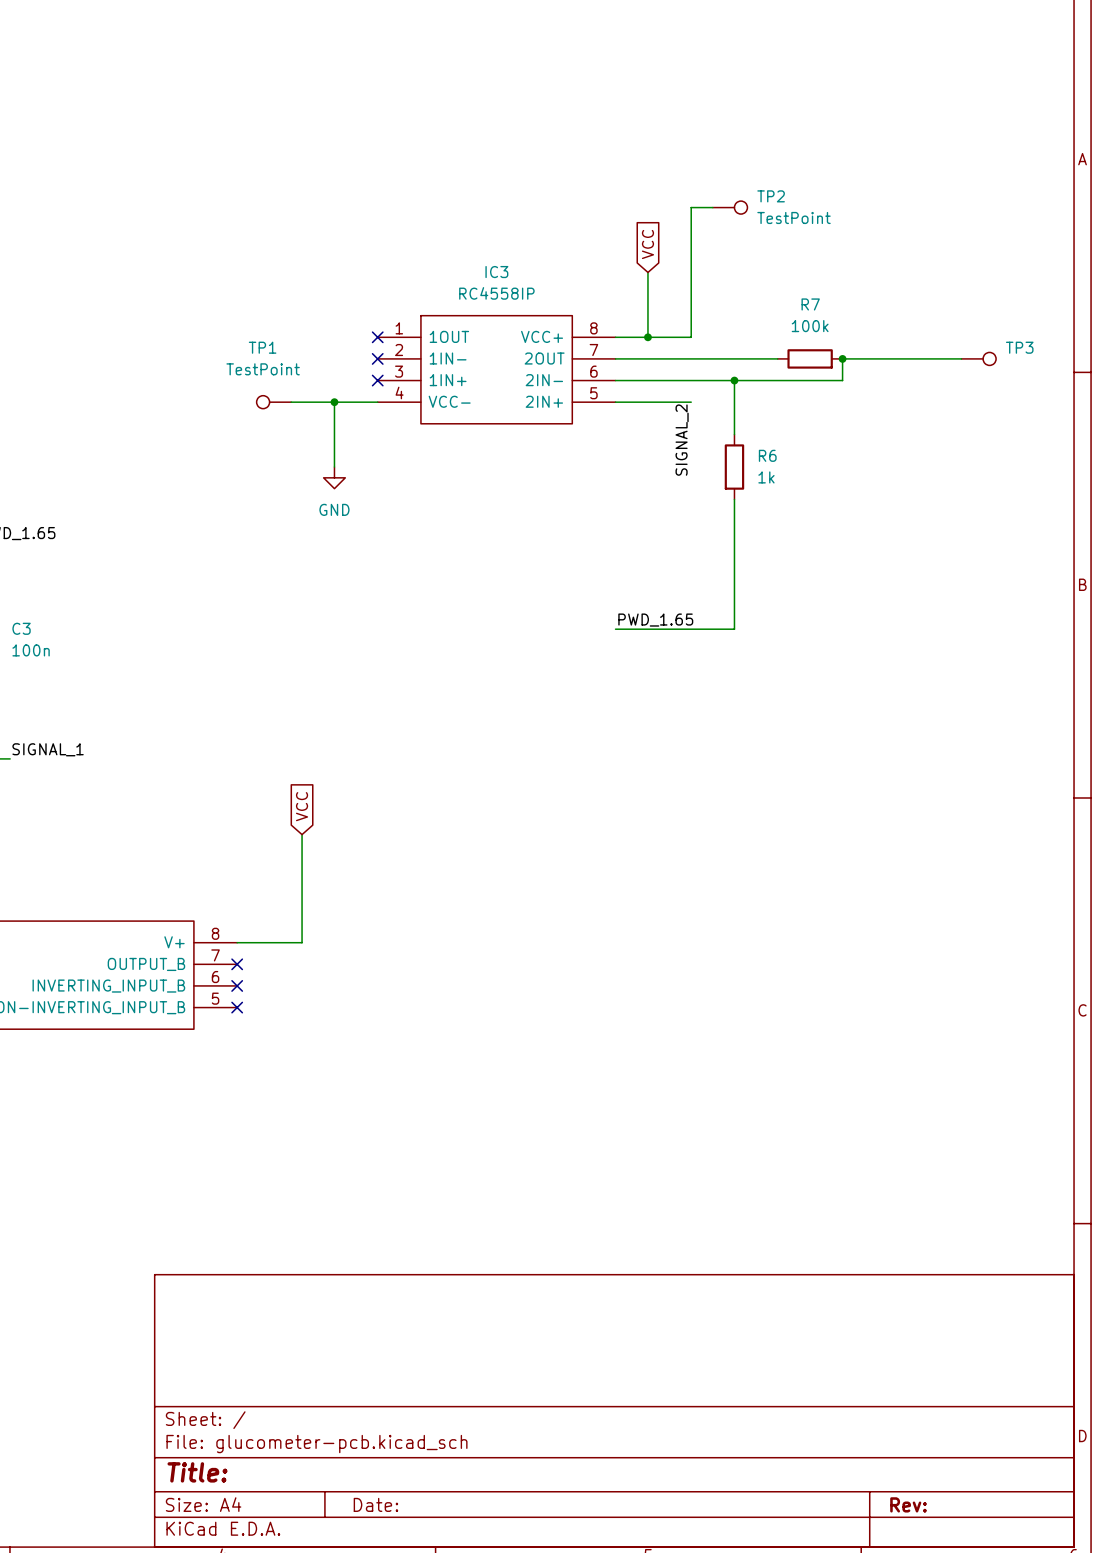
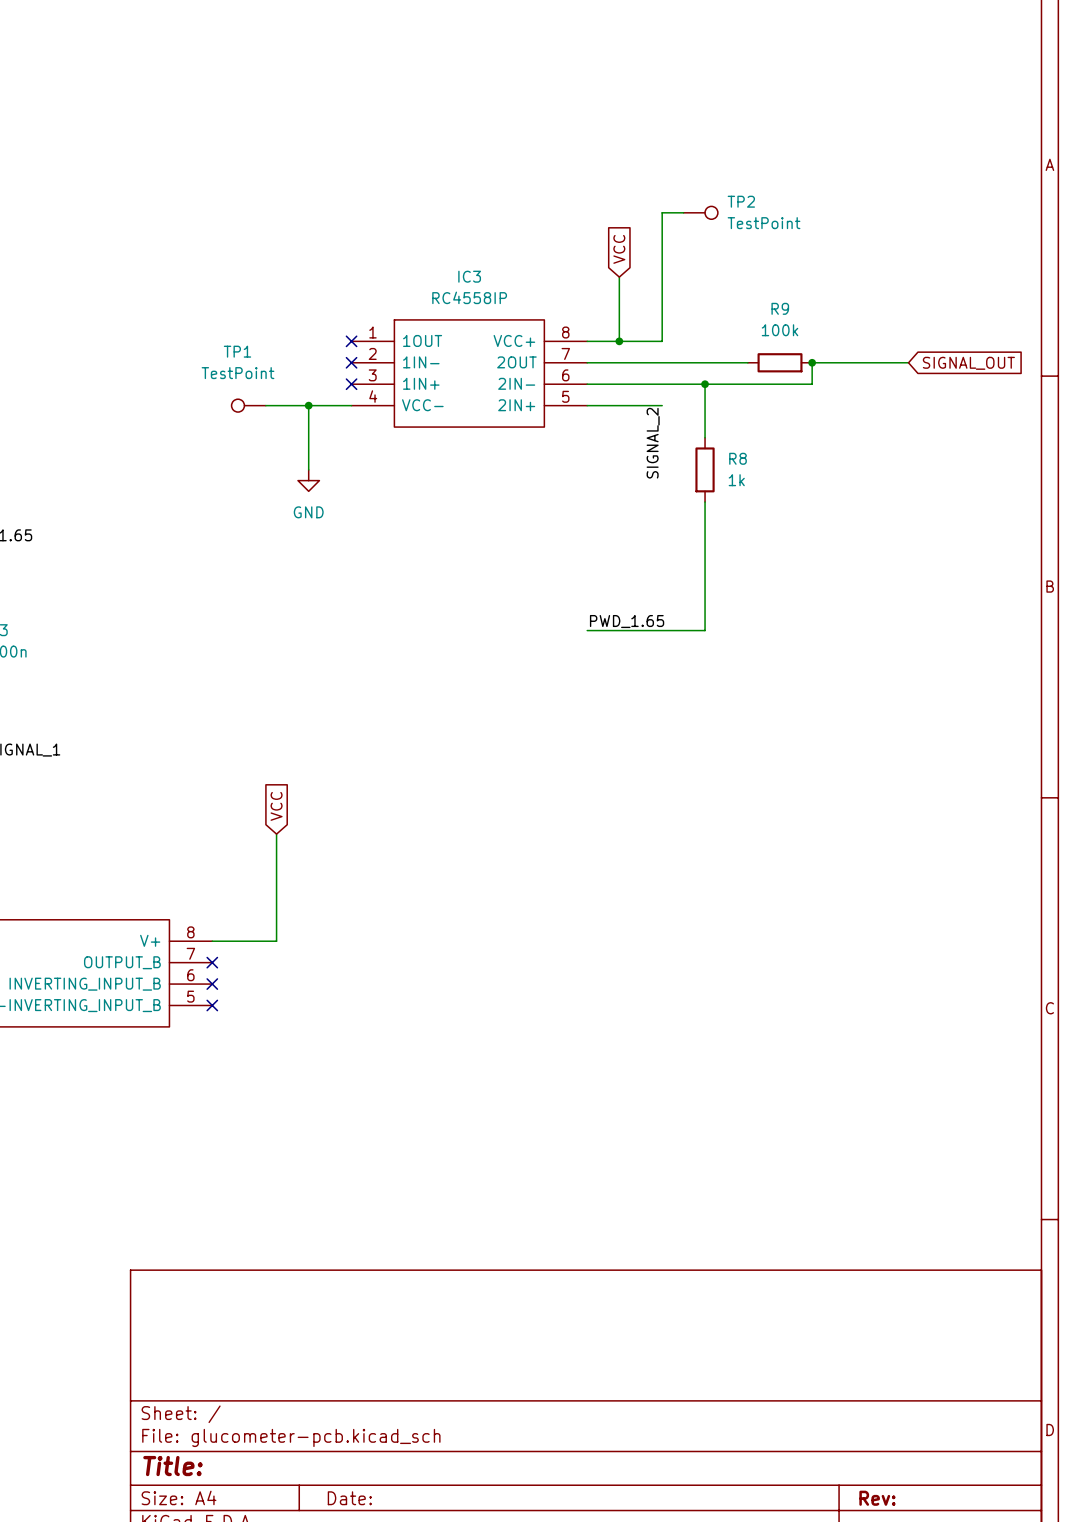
R7 name: R7 (810, 304) -> R9 (780, 308)
wire: (939, 358) (961, 358) -> none
TP3: (978, 358) -> none
global label: none -> SIGNAL_OUT (968, 363)
R6 name: R6 (767, 455) -> R8 (738, 458)

